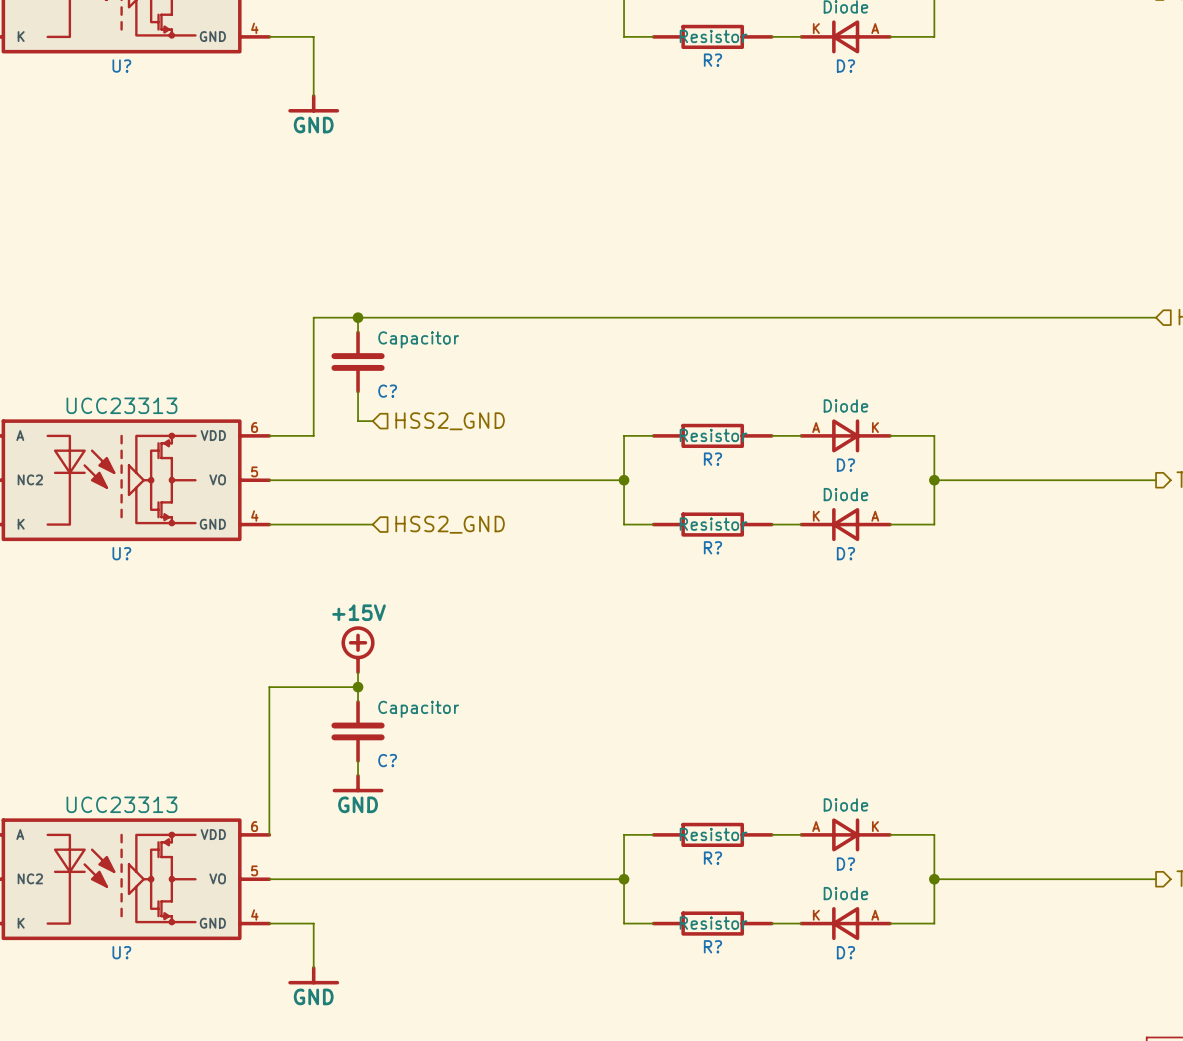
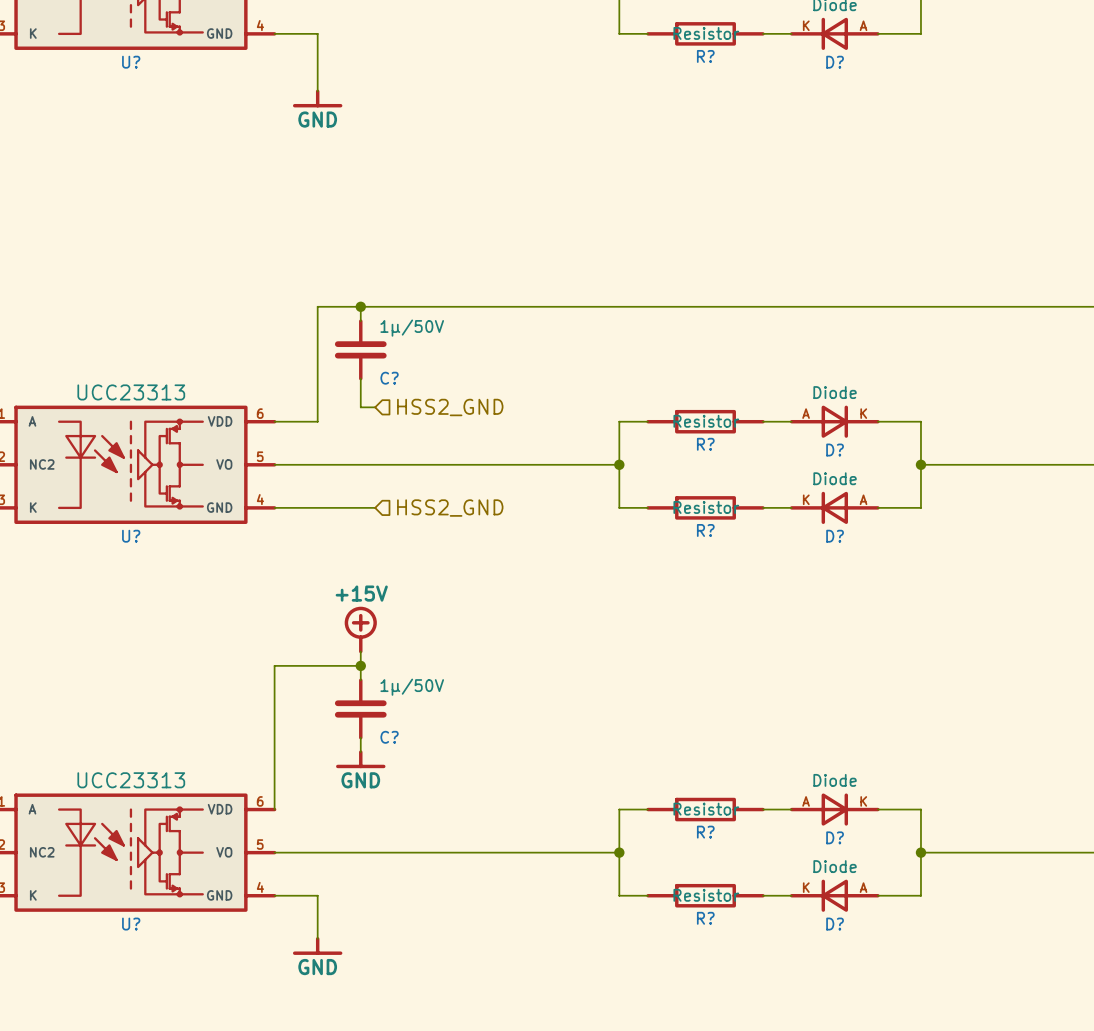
C? value: Capacitor (418, 339) -> 1µ/50V (412, 328)
C? value: Capacitor (418, 709) -> 1µ/50V (412, 687)

